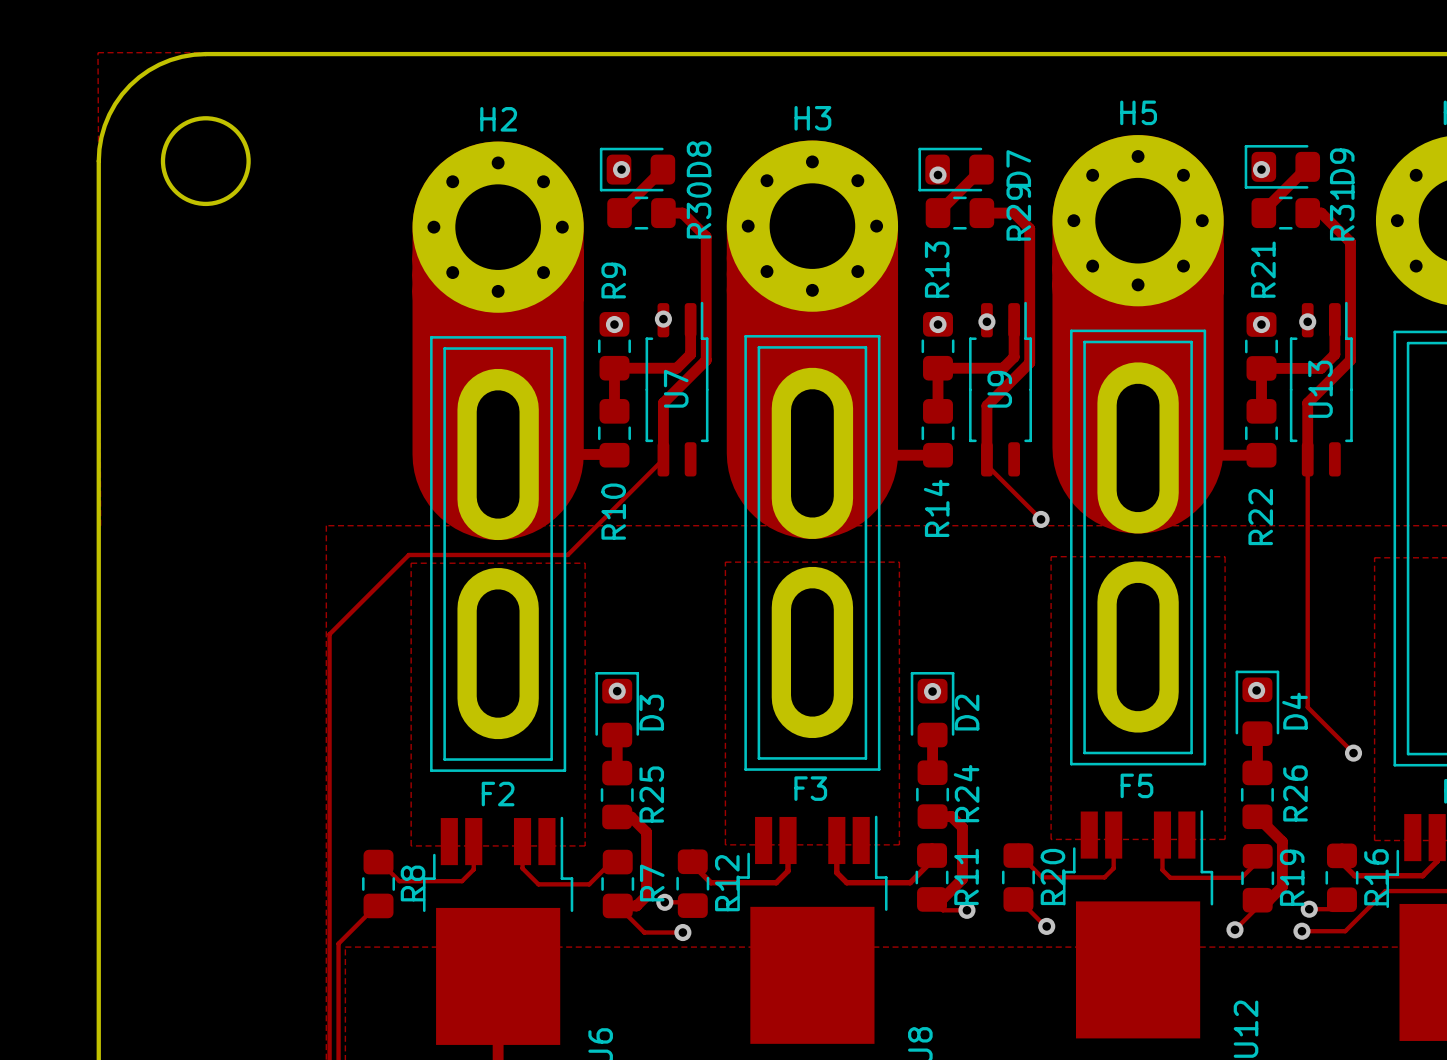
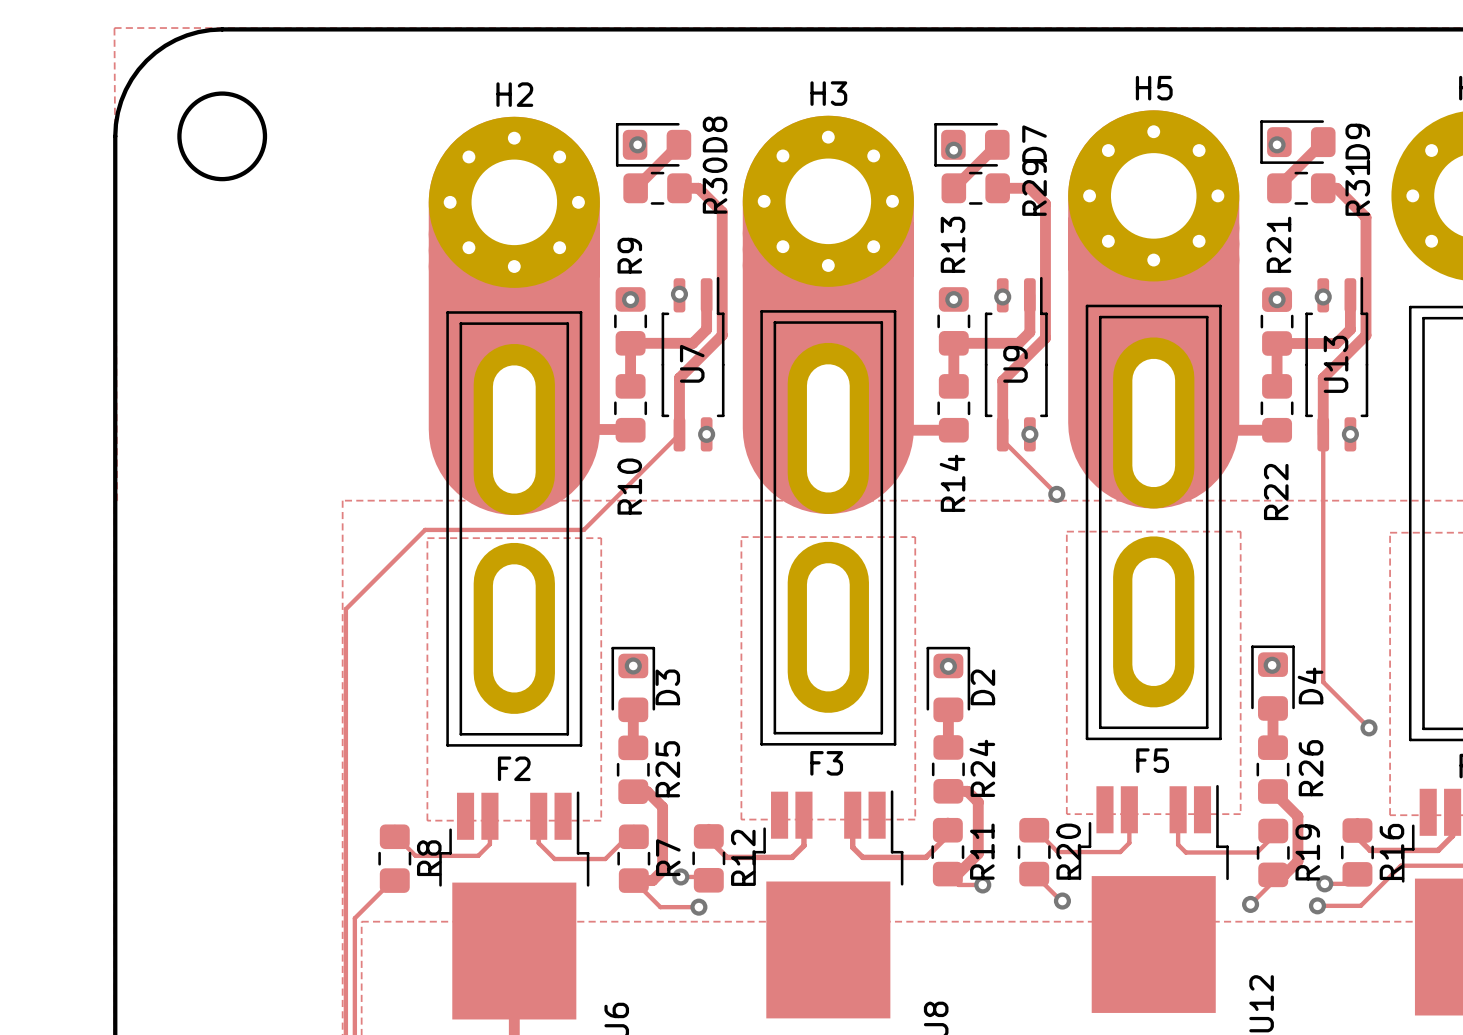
via: none -> (706, 434)
via: none -> (1029, 434)
via: none -> (1350, 434)

